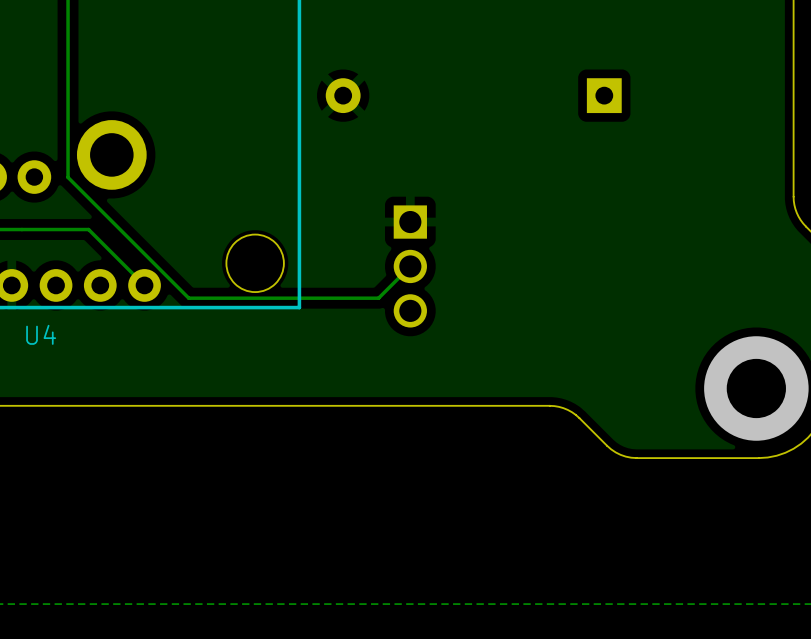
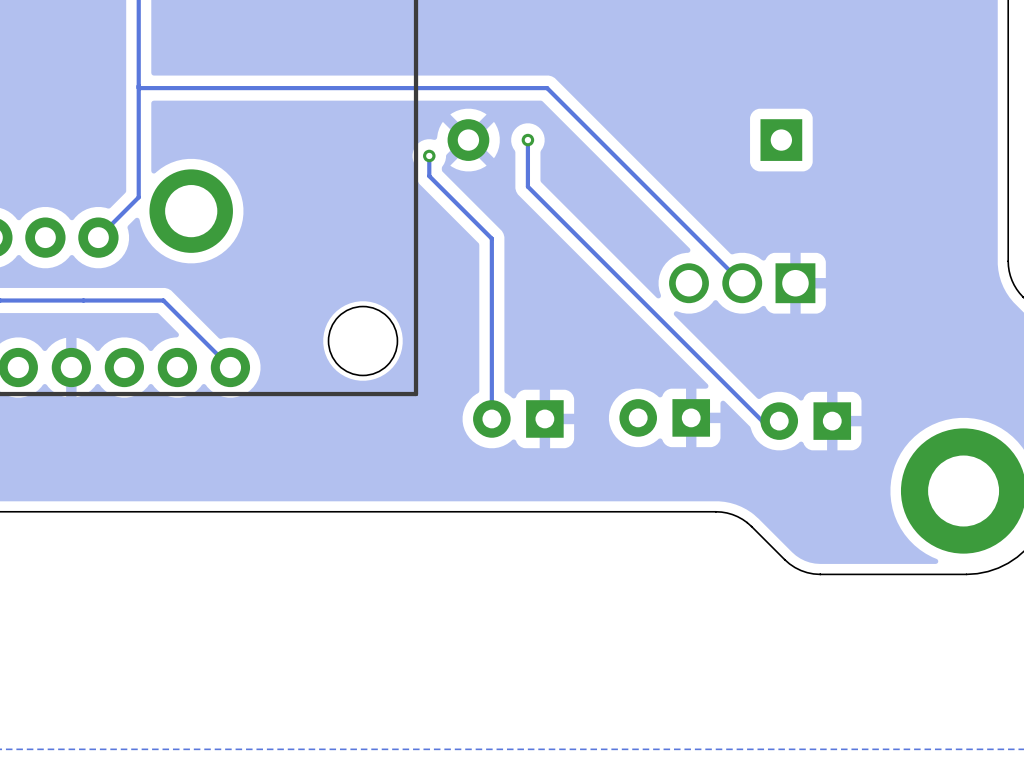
track: none -> (138, 88) (547, 88) (742, 283)
track: none -> (527, 140) (527, 186) (762, 421) (779, 421)
via: none -> (527, 140)
track: none -> (429, 155) (429, 176) (491, 238) (491, 418)
via: none -> (429, 155)
track: (68, 143) (68, 177) (188, 298) (378, 298) (410, 266) -> (138, 197) (98, 237)
part rotation: 0° (410, 266) -> 90° clockwise (742, 283)
part position: (410, 266) -> (742, 283)
part: none -> (664, 417)
part: none -> (518, 418)
part: none -> (805, 421)
U4 name: U4 (41, 334) -> none

